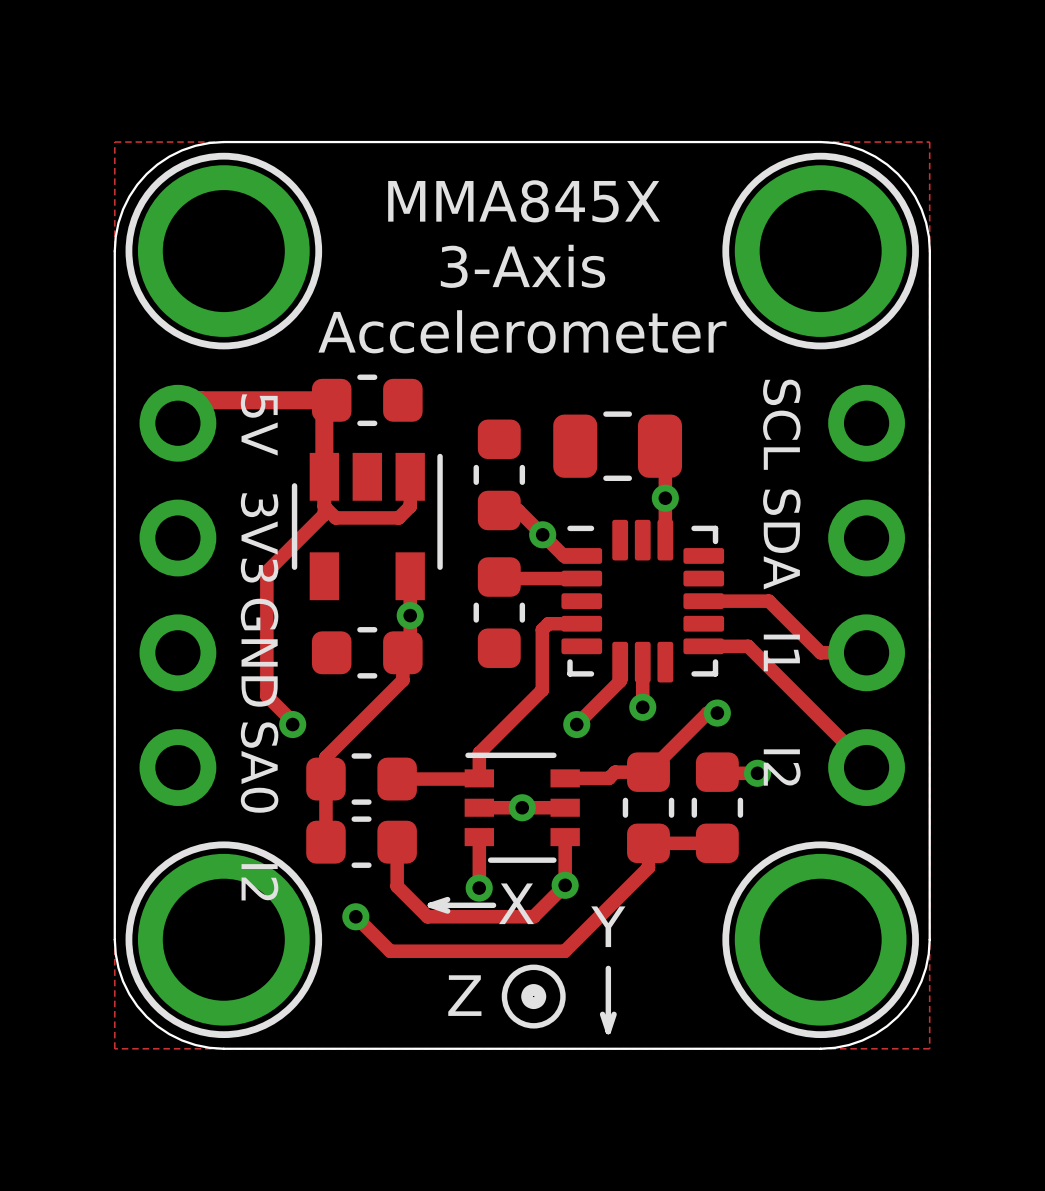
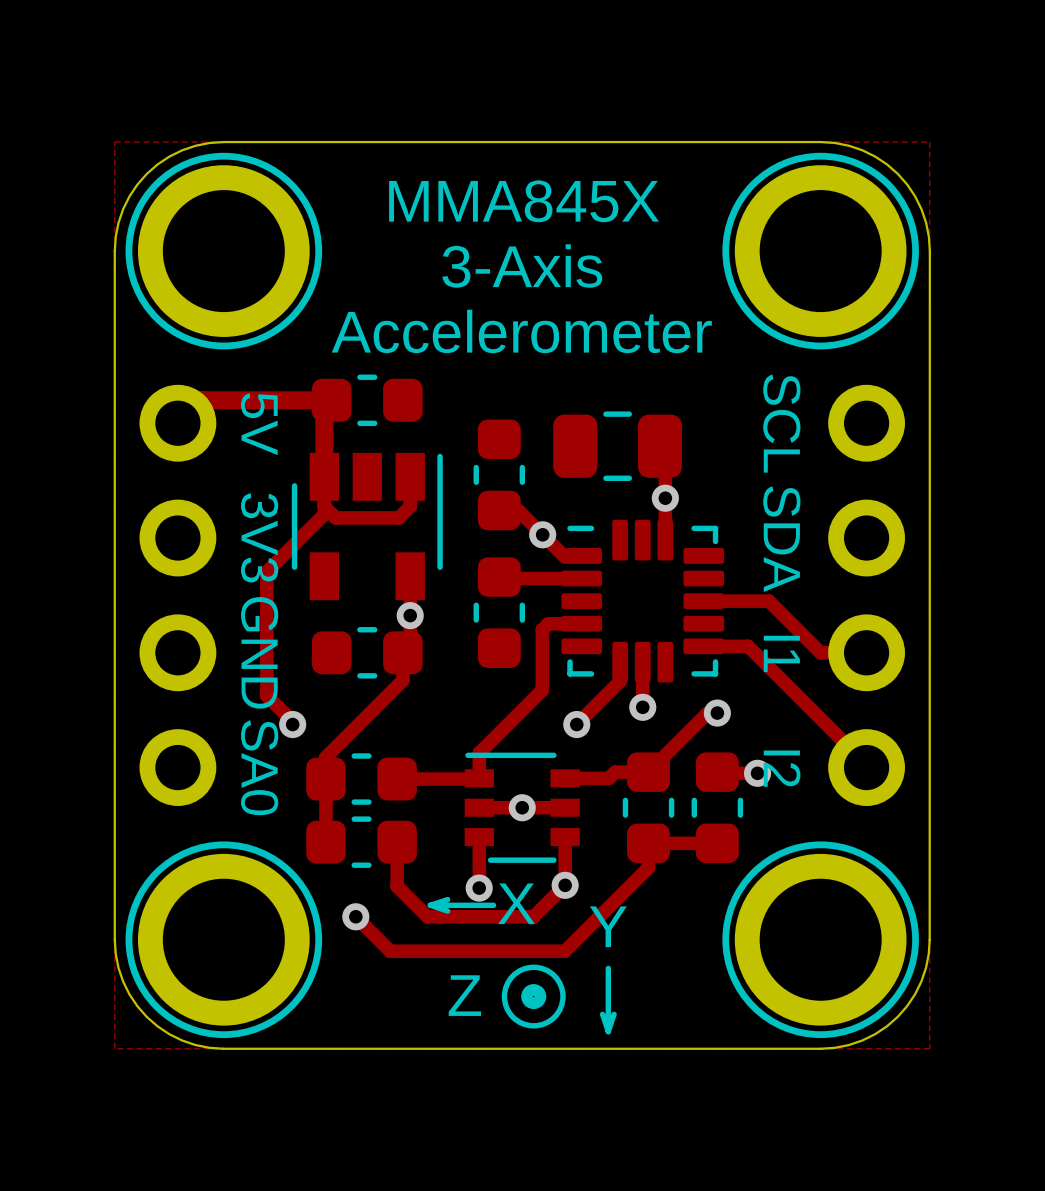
text: I2 (259, 882) -> none

